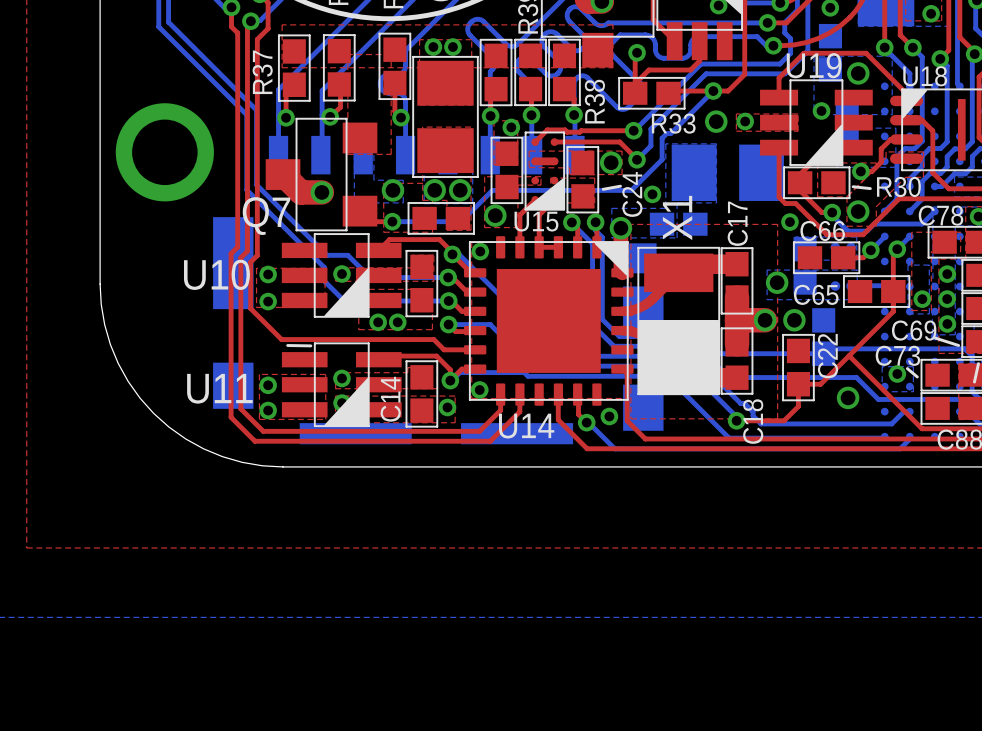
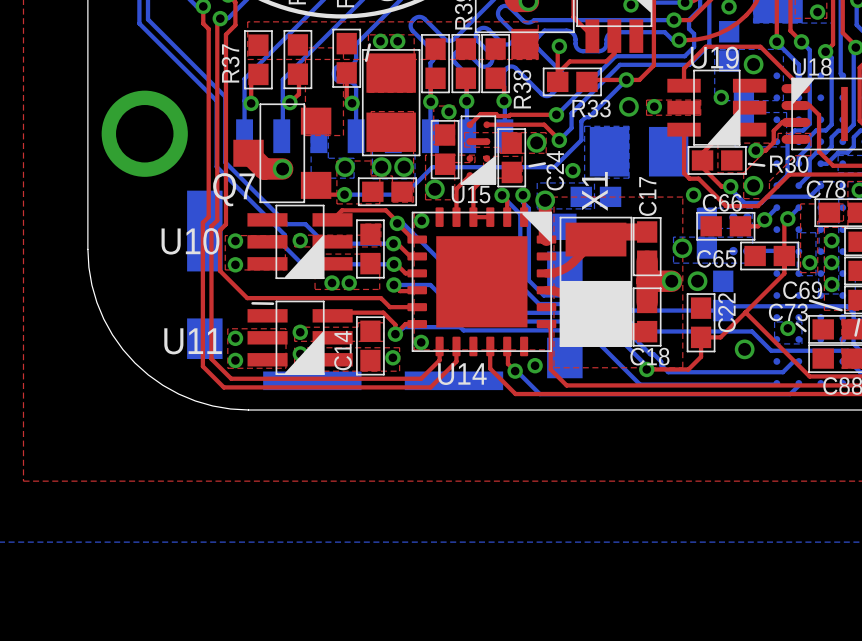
line: none -> (369, 44) (366, 60)
line: (935, 338) (958, 345) -> none
line: none -> (810, 300) (841, 310)
C18 name rotation: 0° (753, 421) -> 90° clockwise (649, 356)

